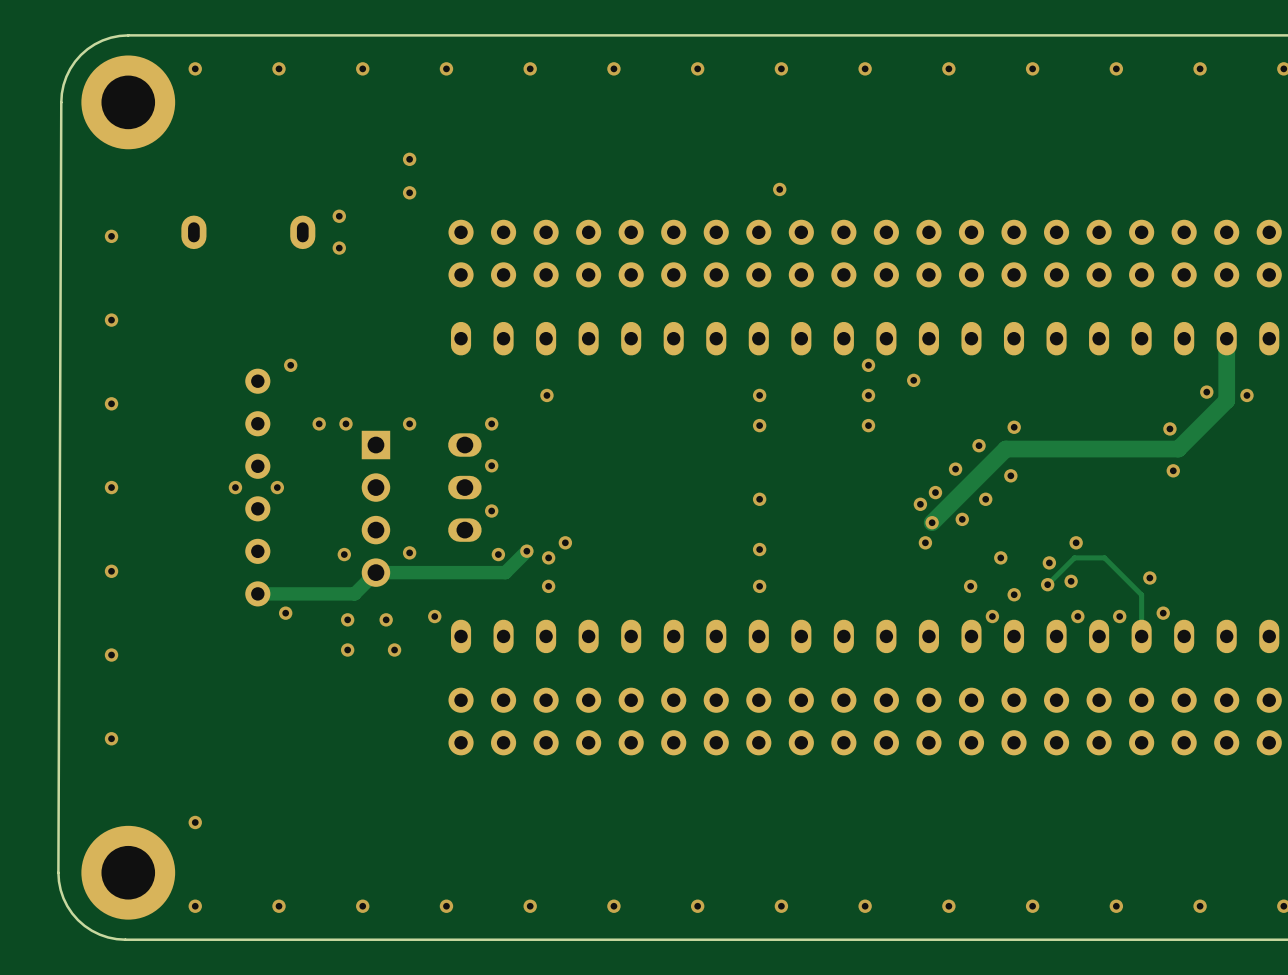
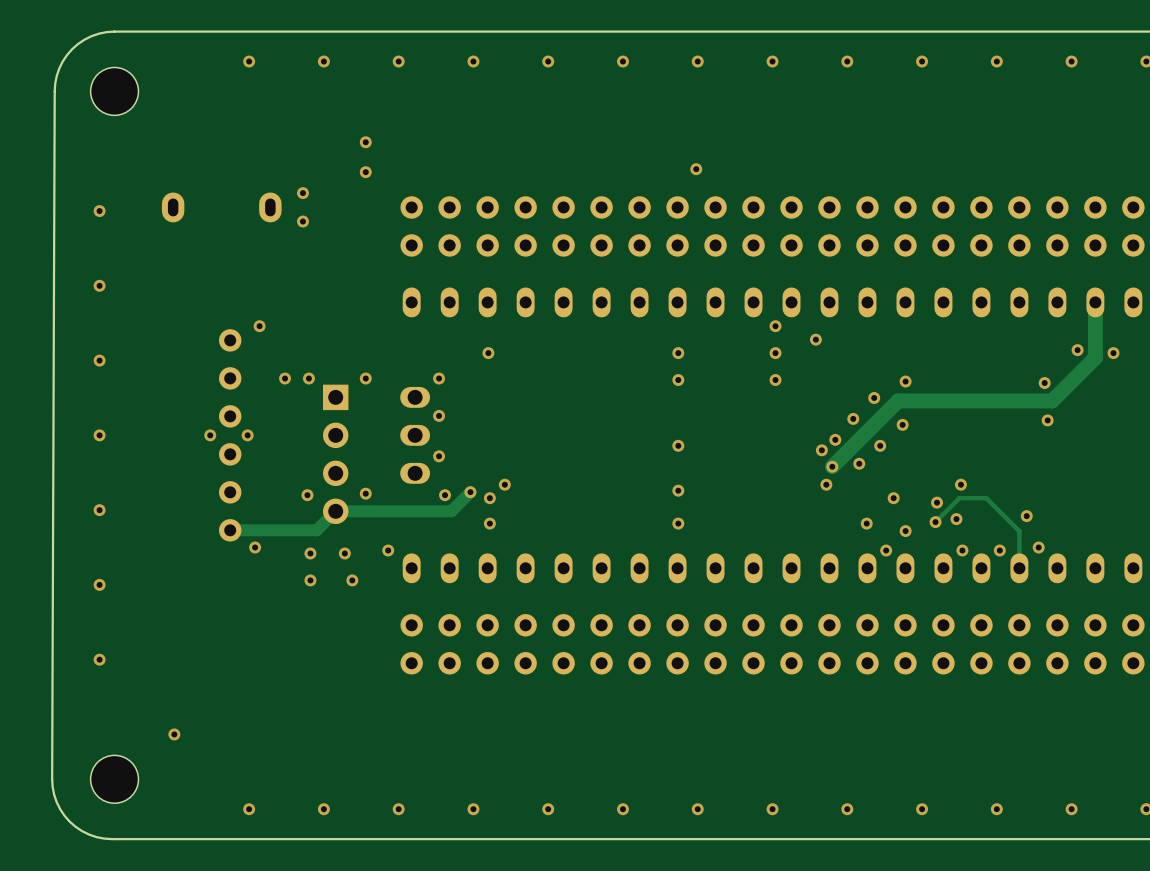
part footprint: [81, 55, 176, 150] -> [90, 67, 139, 116]
via: (195, 68) -> none
part footprint: [81, 825, 176, 920] -> [90, 755, 139, 804]
via: (195, 906) -> none

